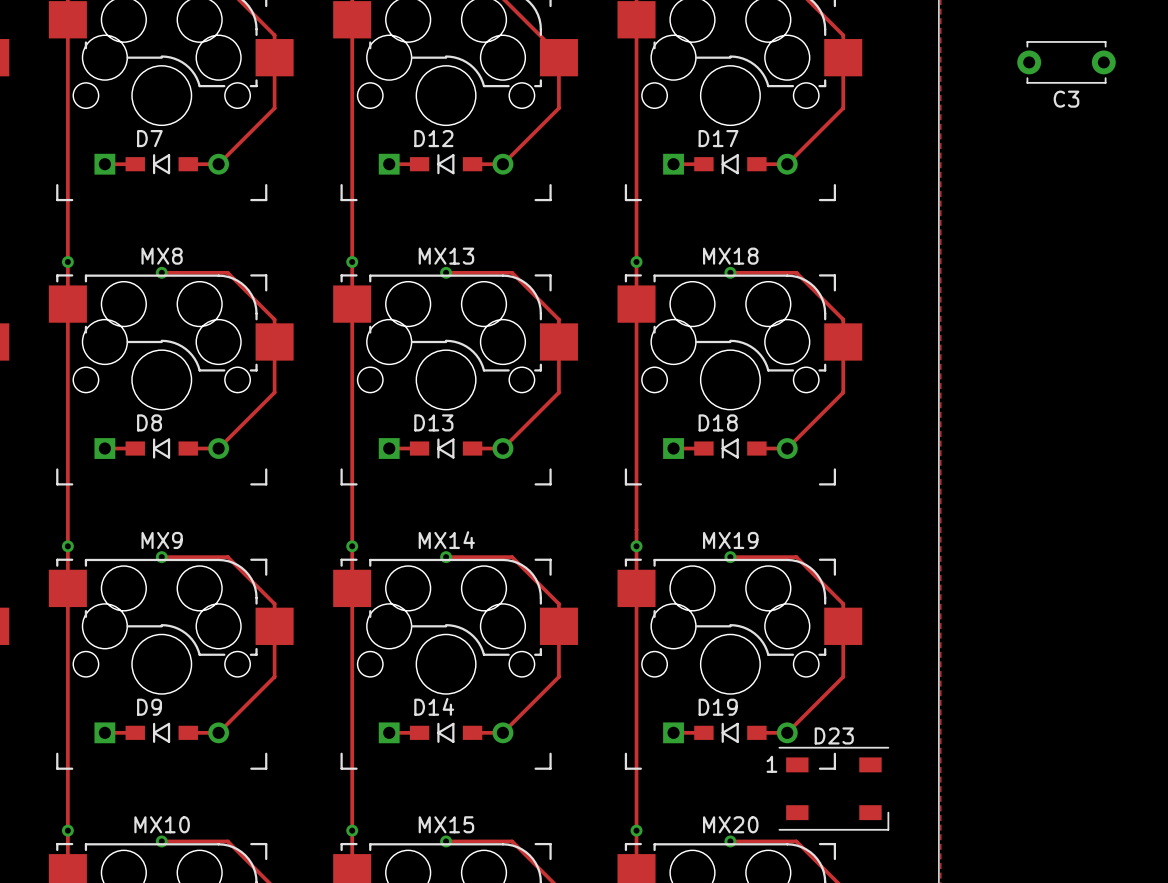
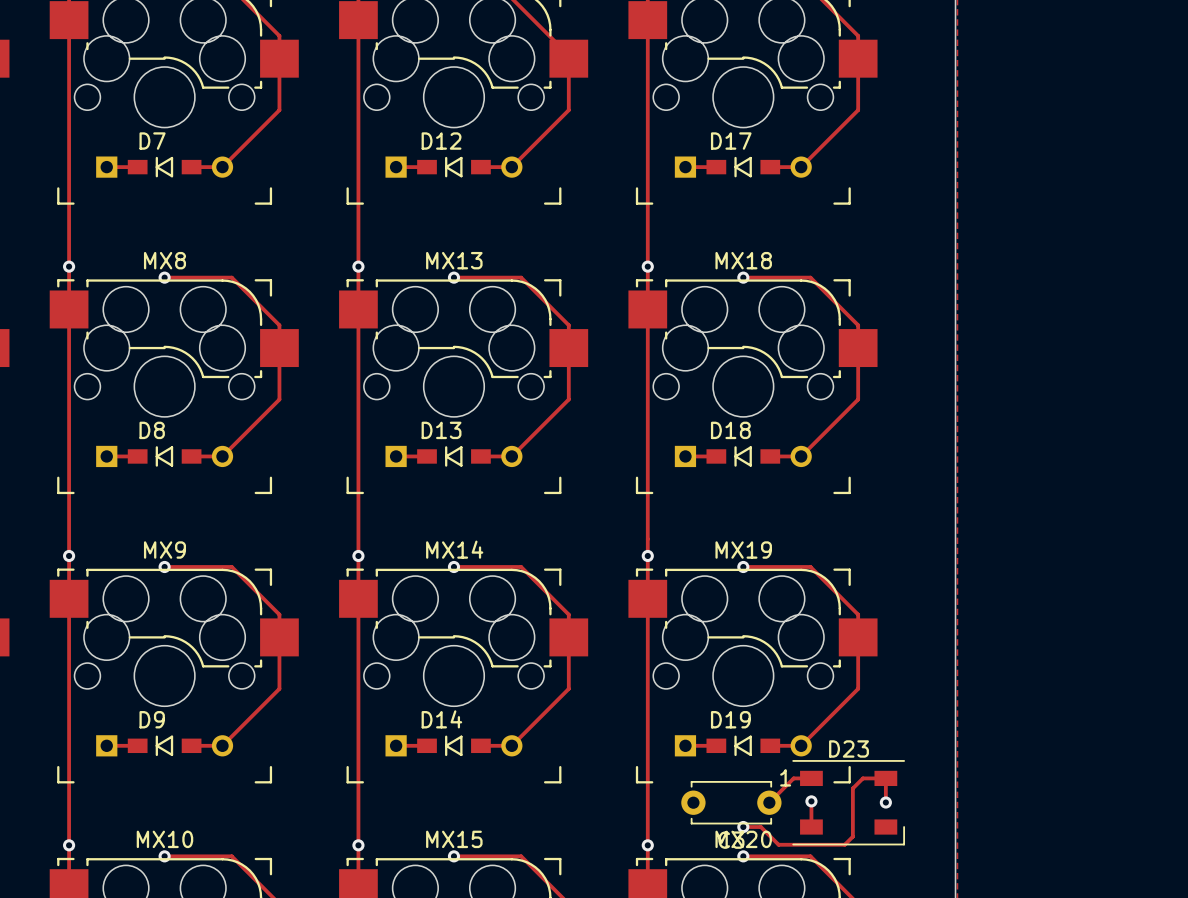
C3 position: (1066, 62) -> (731, 802)
track: none -> (811, 778) (793, 778) (769, 802)
track: none -> (811, 801) (811, 827)
via: none -> (811, 801)
track: none -> (885, 802) (885, 778) (862, 778) (852, 788) (852, 836) (844, 844) (778, 844) (760, 827) (743, 827)
via: none -> (885, 802)
via: none -> (743, 827)

